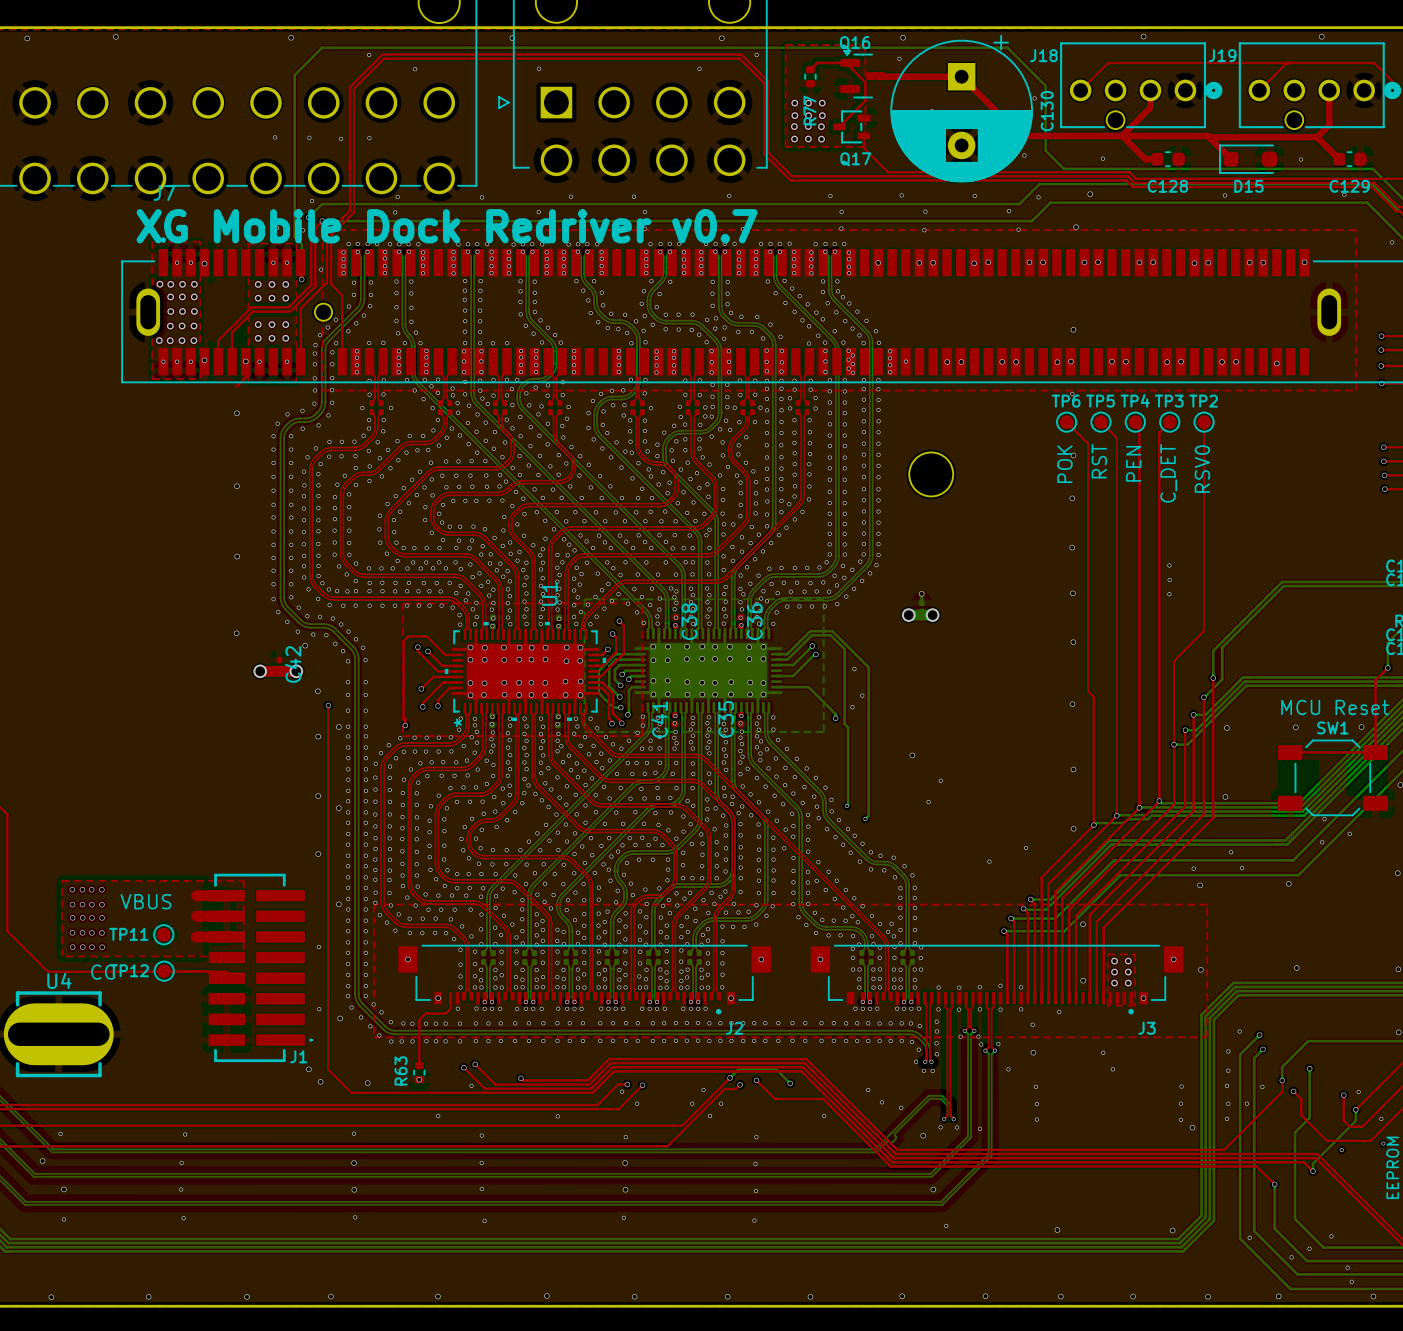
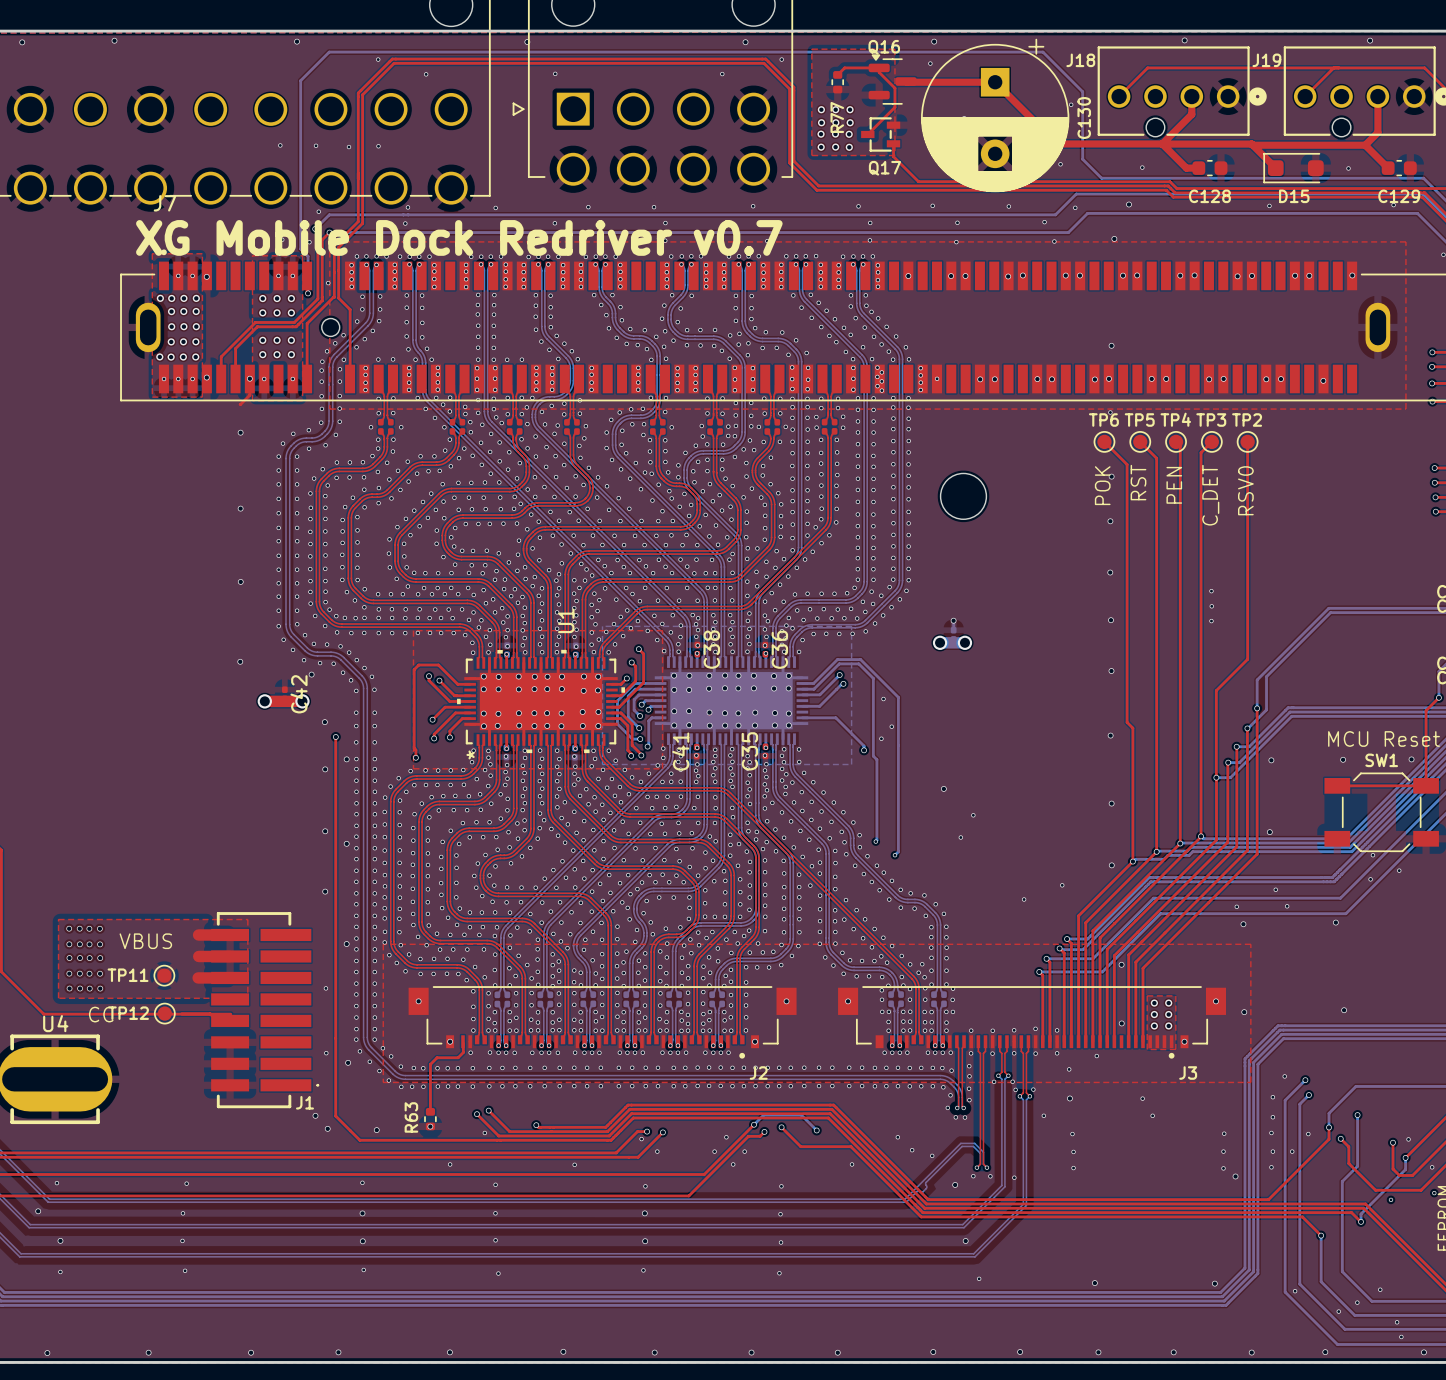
via: (808, 343) -> none

